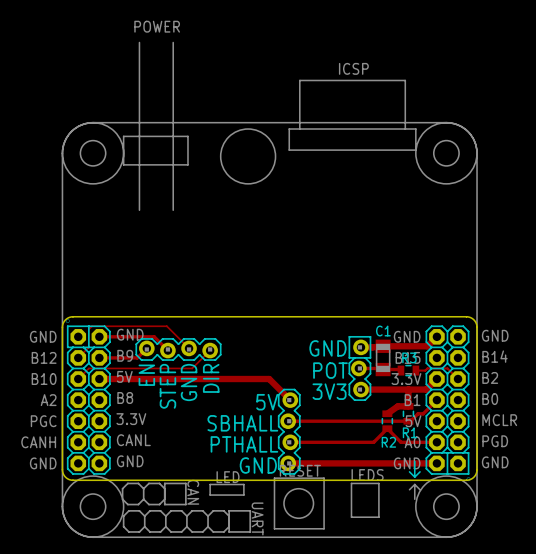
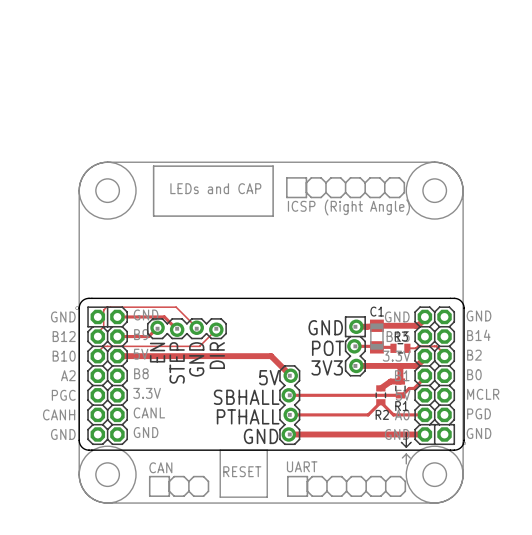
part: (269, 289) -> none
part: none -> (270, 332)

